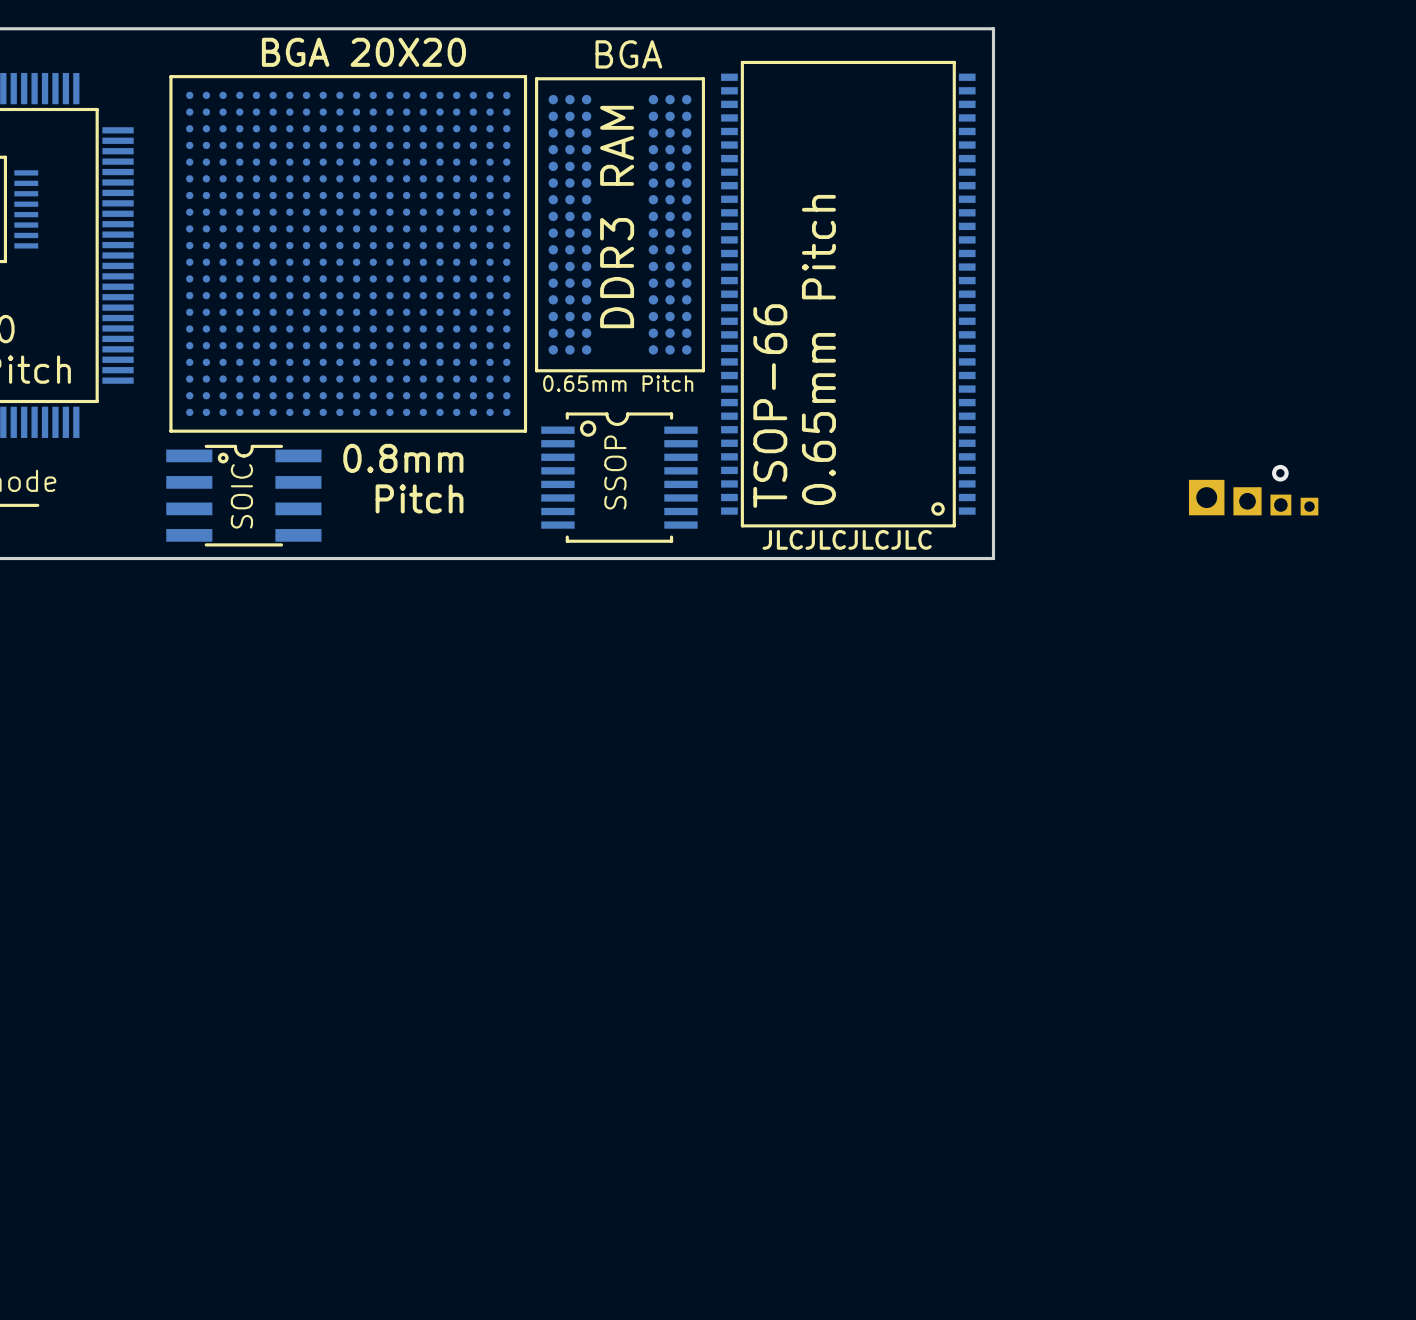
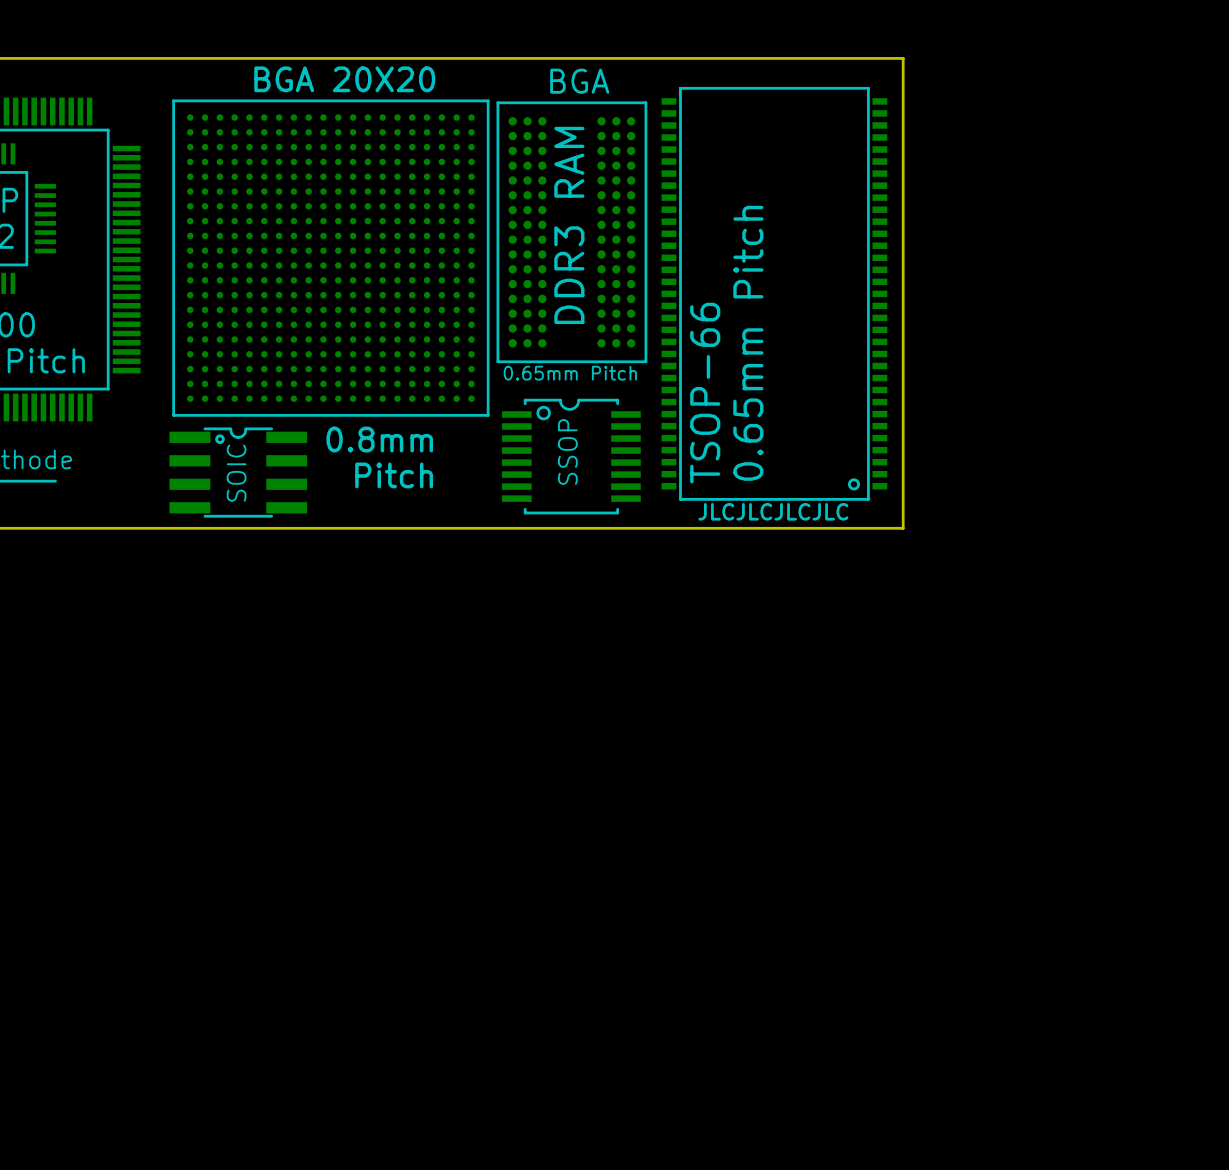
via: (1280, 473) -> none
part: (1206, 497) -> none
part: (1247, 501) -> none
part: (1280, 505) -> none
part: (1309, 506) -> none

